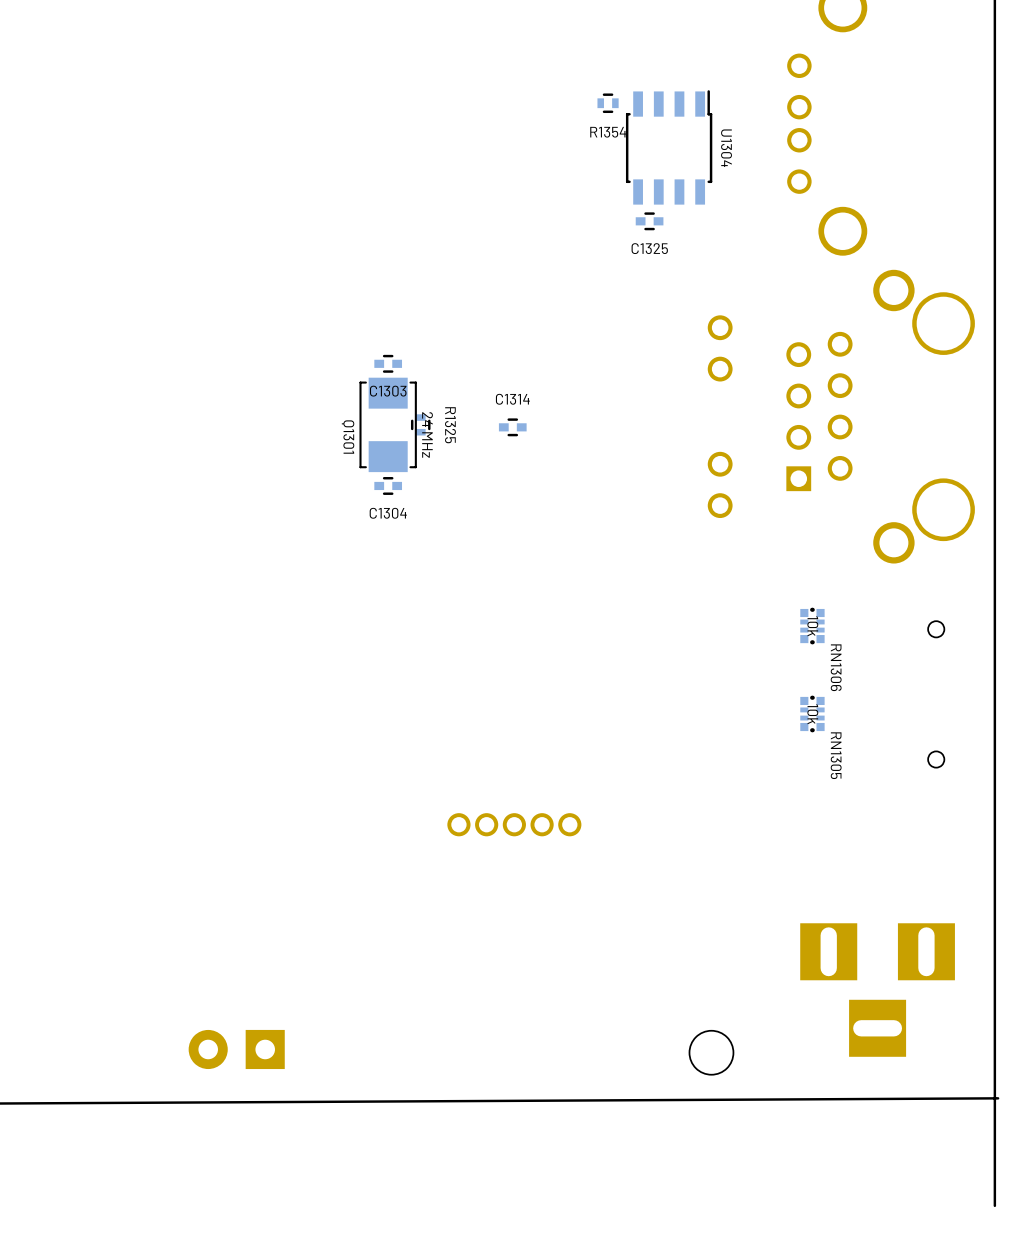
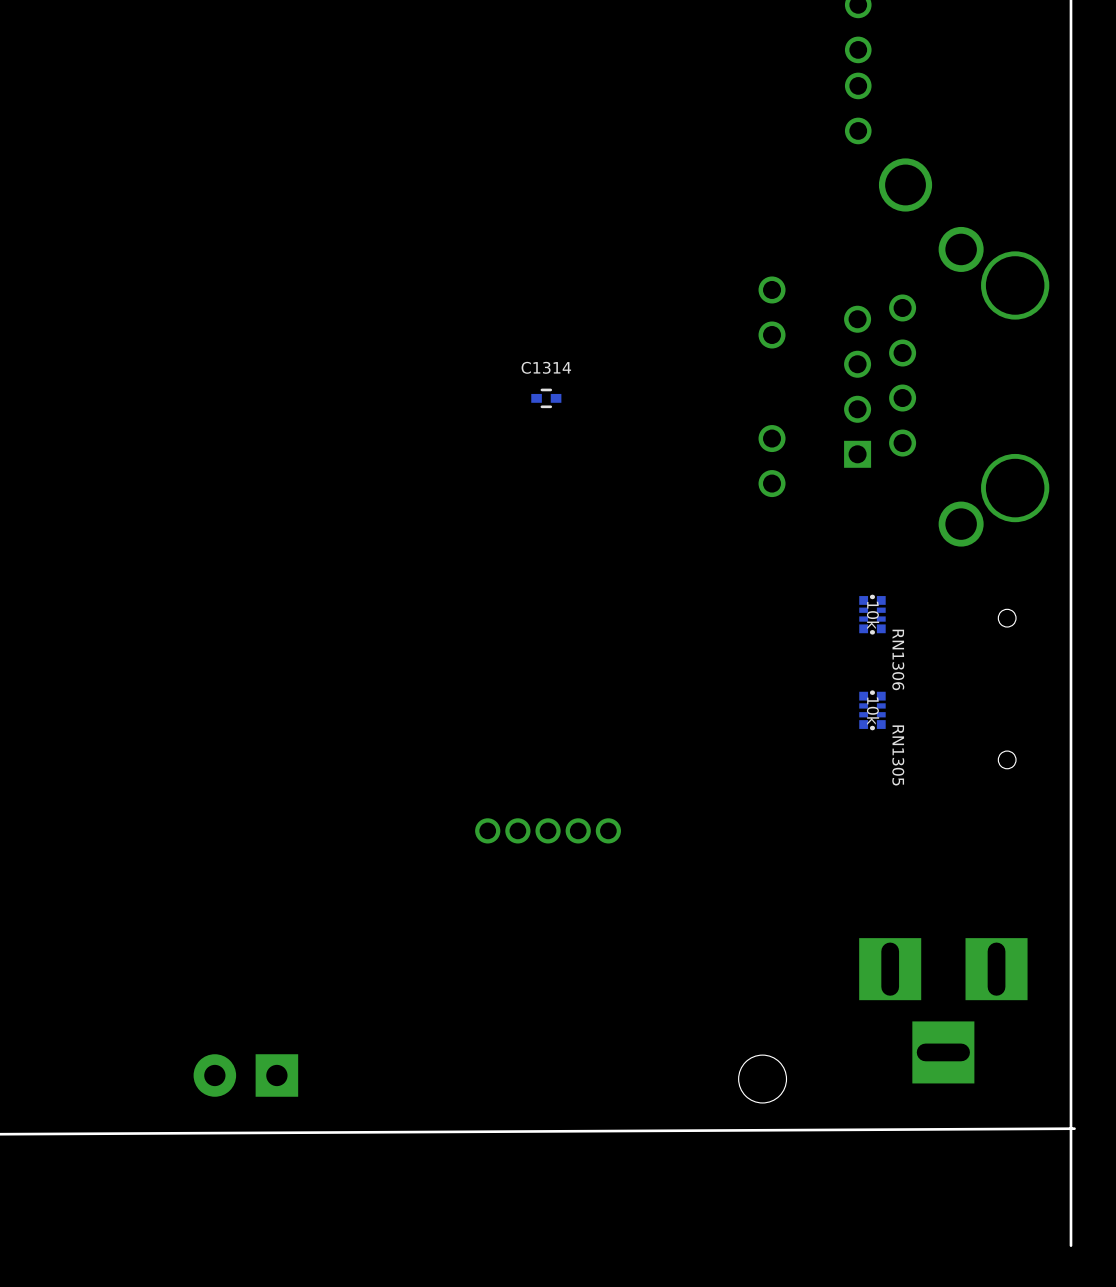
R1354: (608, 103) -> none
U1304: (669, 147) -> none
C1325: (649, 221) -> none
C1303: (388, 363) -> none
Q1301: 24 MHz (388, 424) -> none
R1325: (420, 424) -> none
C1304: (388, 485) -> none

